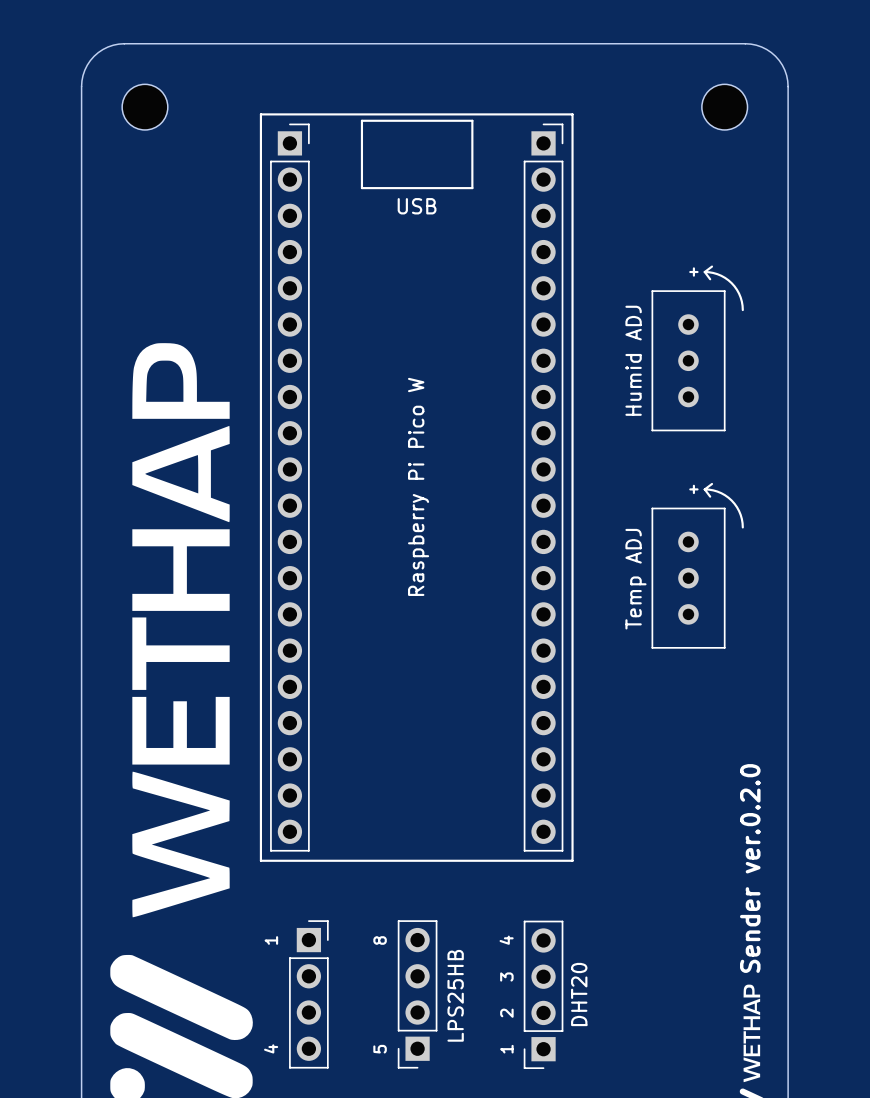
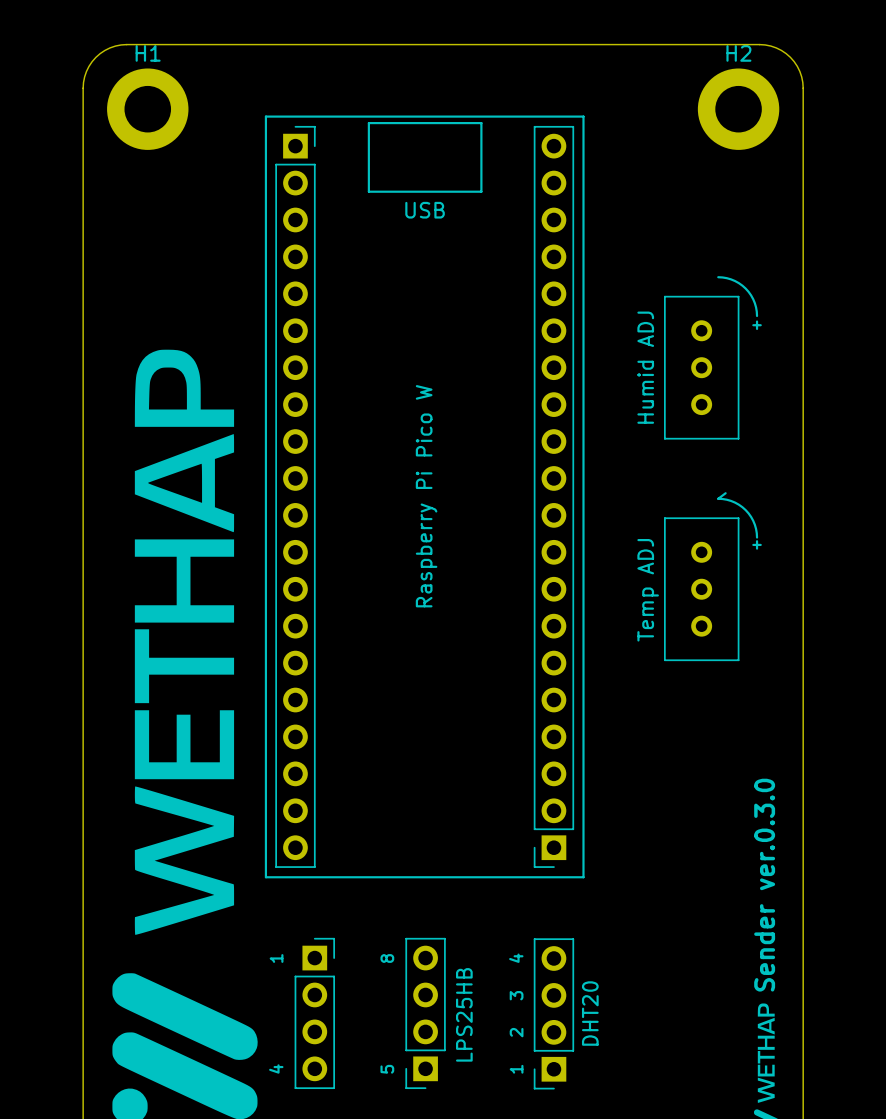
part: (144, 107) -> none
H1: none -> (147, 109)
part: (724, 107) -> none
H2: none -> (738, 109)
line: (712, 266) (704, 272) (710, 279) -> none
line: (693, 268) (693, 275) -> (757, 321) (757, 328)
line: (690, 272) (697, 272) -> (753, 325) (760, 325)
line: (693, 485) (693, 493) -> (757, 541) (757, 548)
part rotation: 0° (543, 487) -> 180° (553, 496)
line: (690, 489) (697, 489) -> (753, 544) (760, 544)
line: (704, 489) (710, 496) -> none
text: Sender ver.0.2.0 (750, 868) -> Sender ver.0.3.0 (764, 885)

